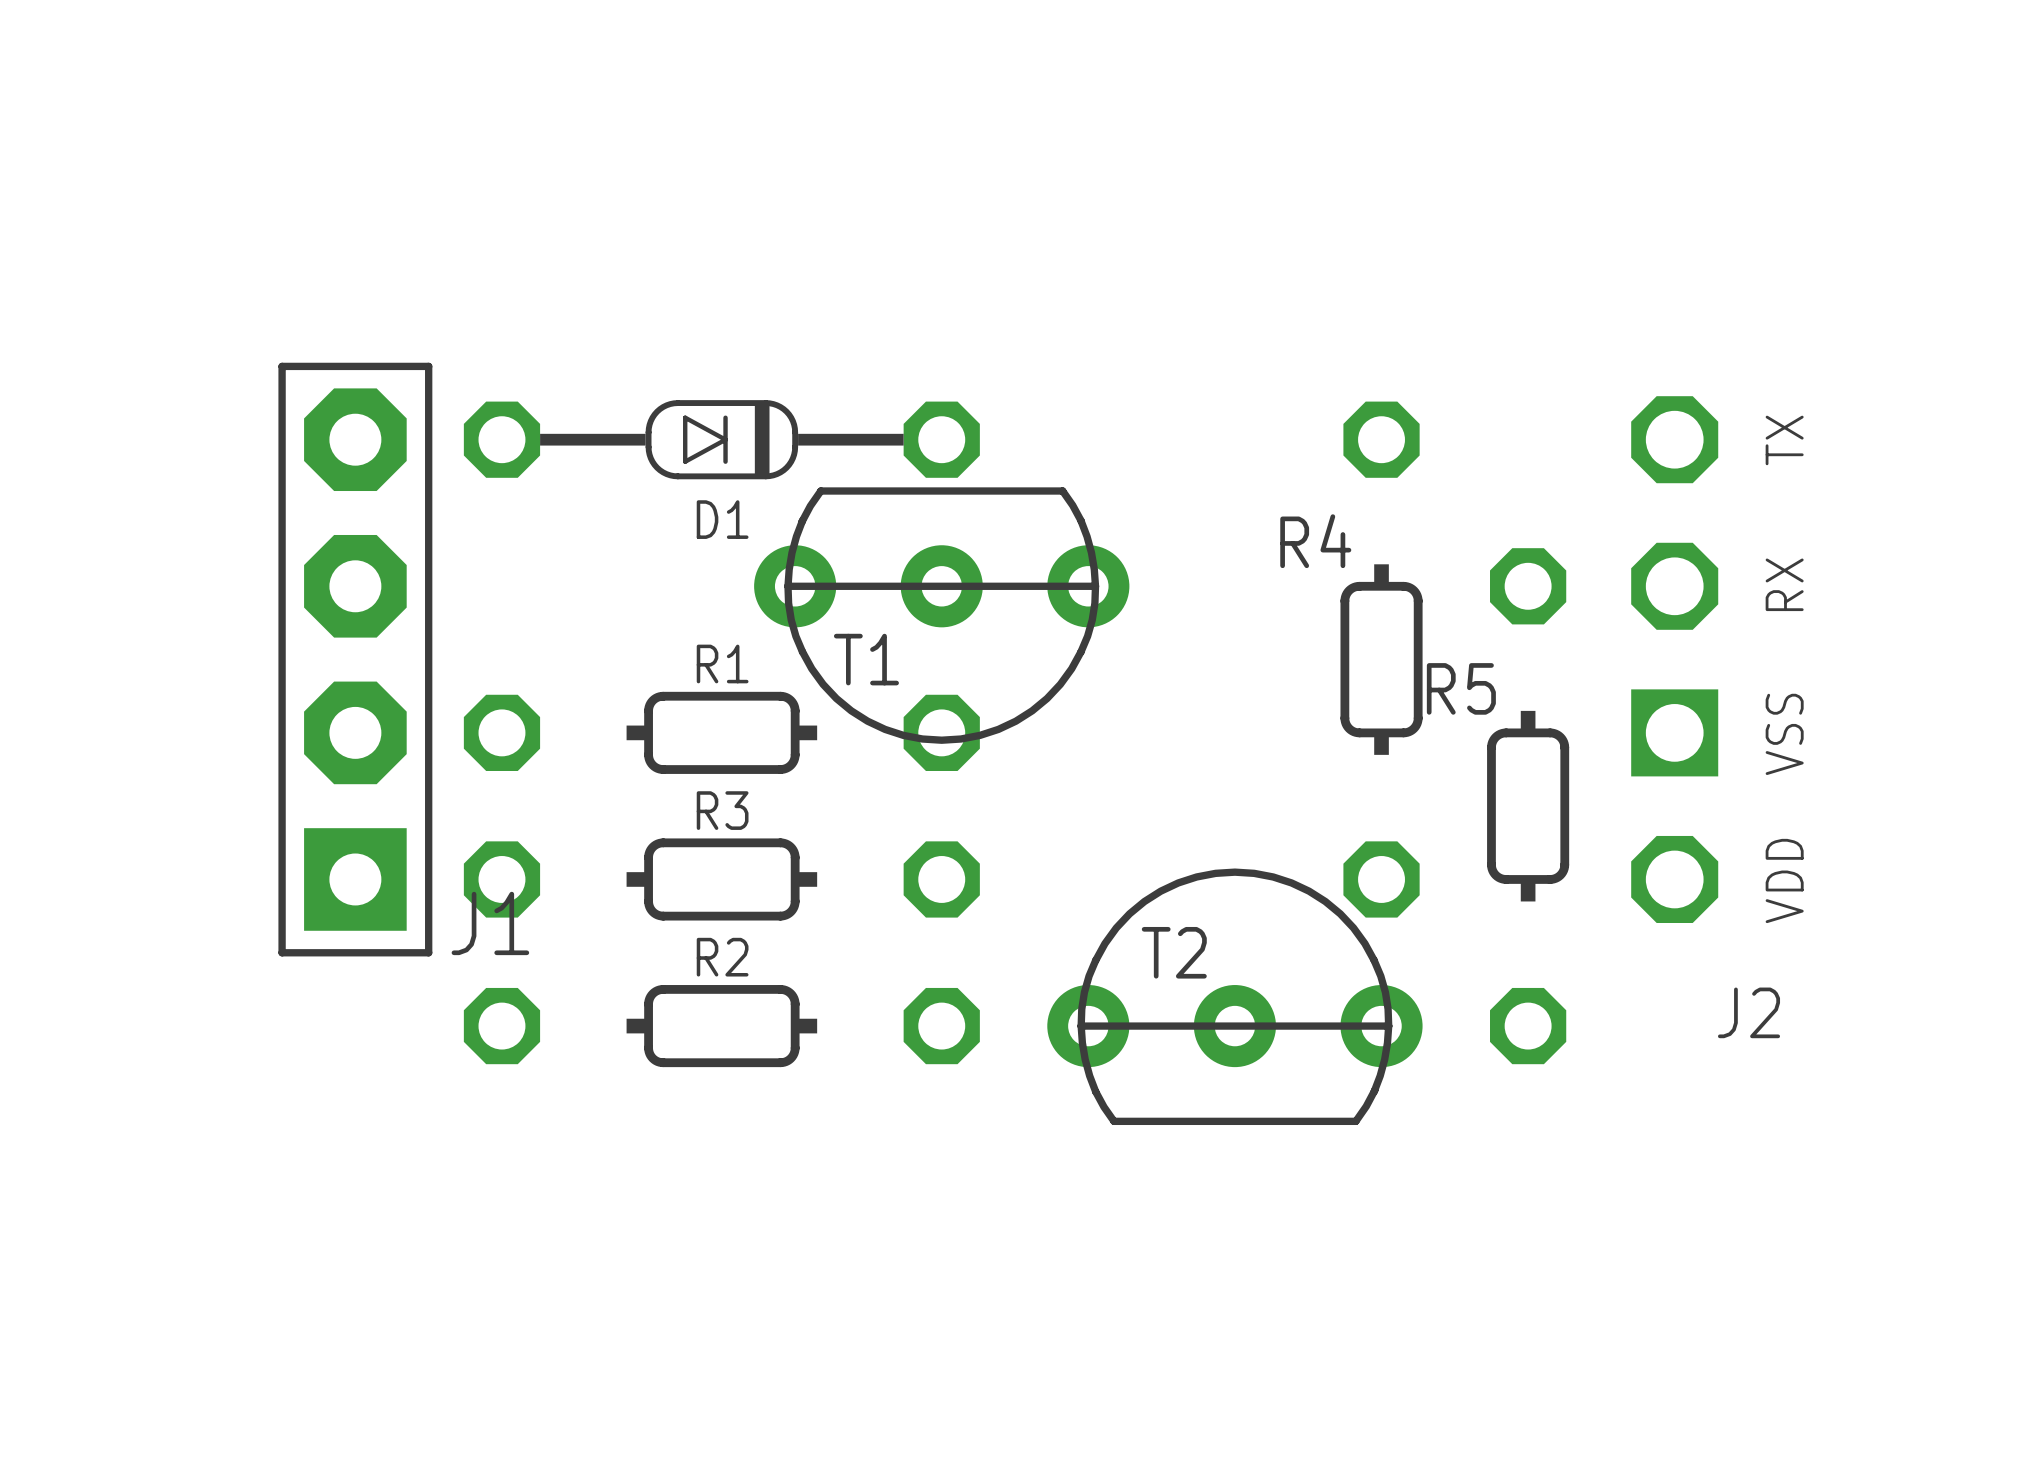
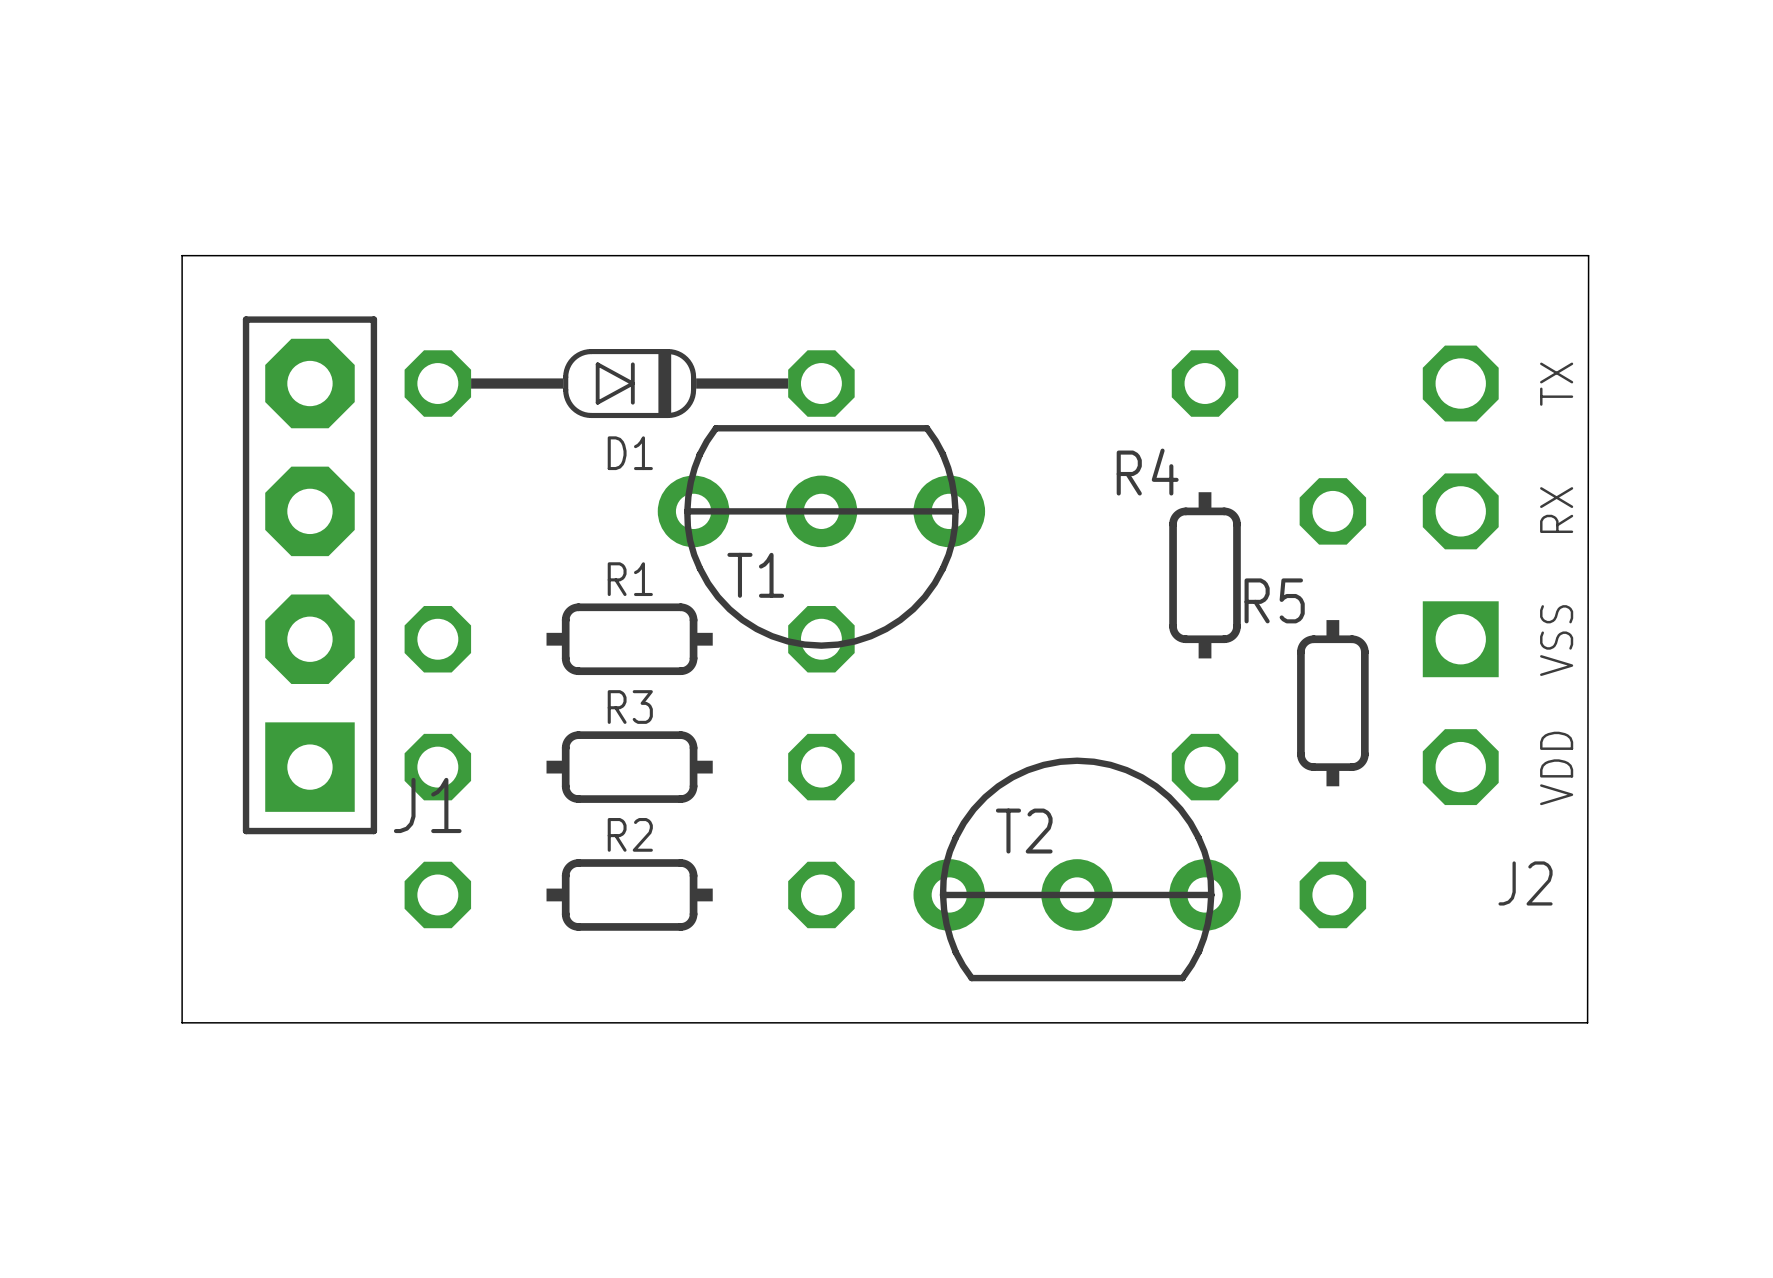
board edge: none -> (182, 255) (1588, 255) (1587, 1022) (182, 1022) (182, 255)

